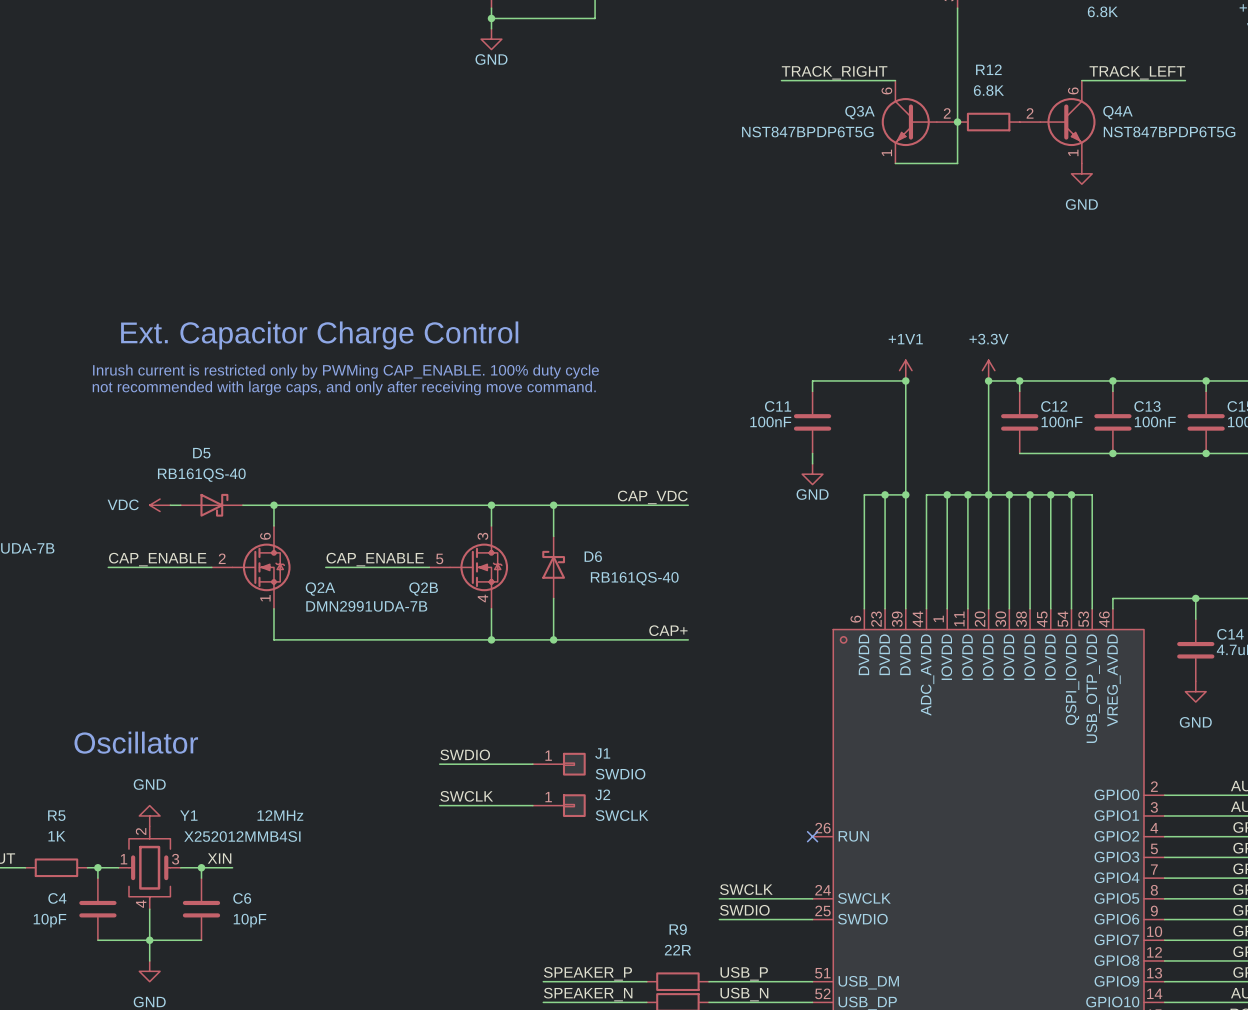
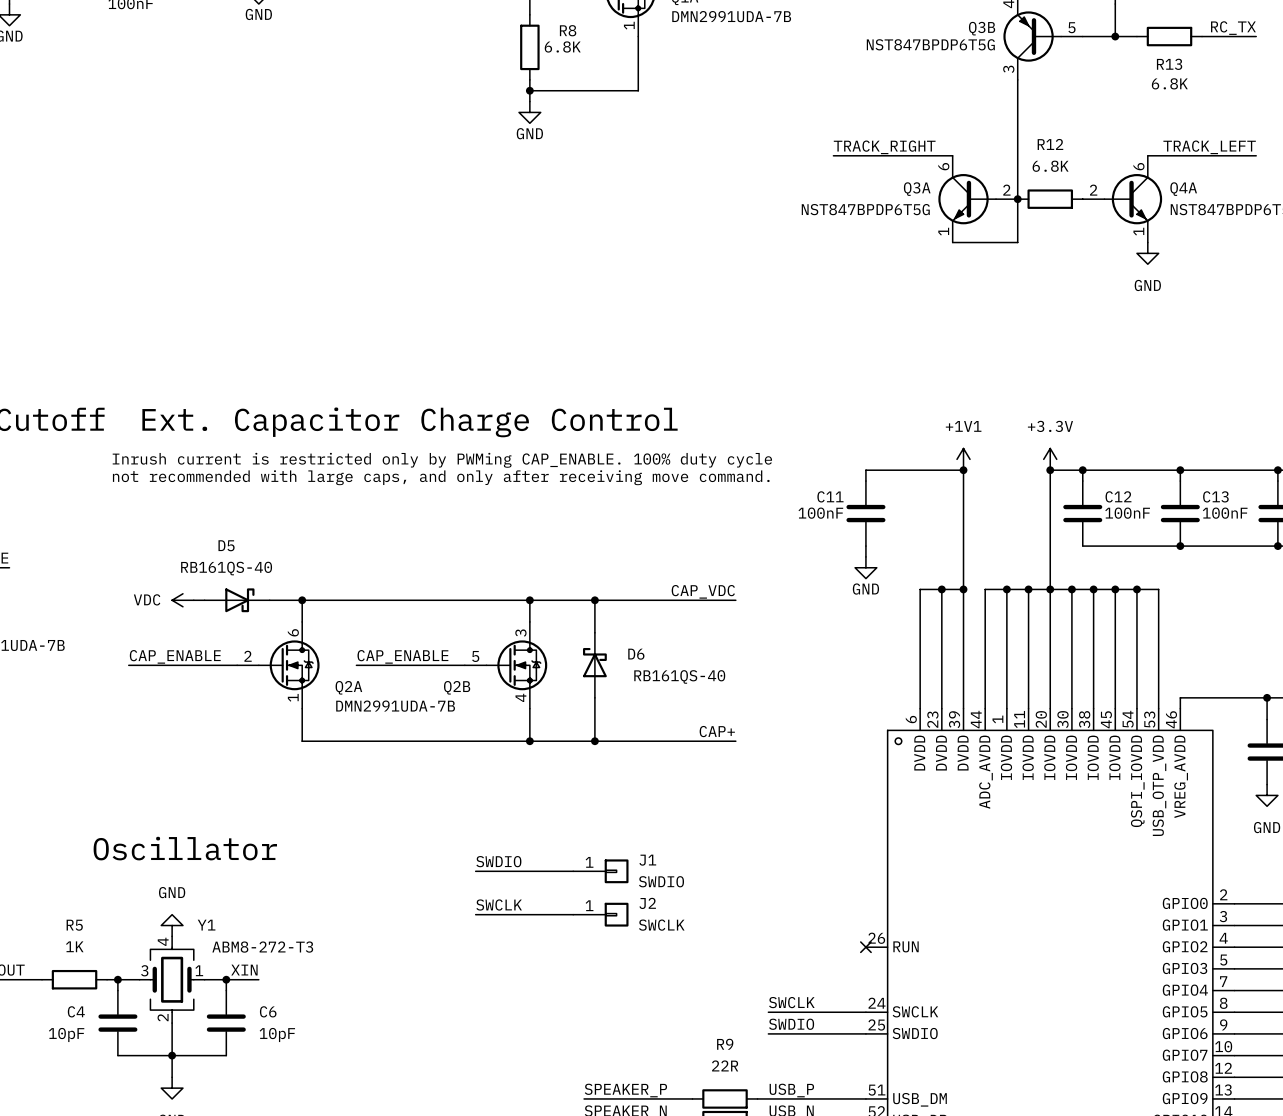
Y1 text: 12MHz (280, 815) -> none
Y1 value: X252012MMB4SI (242, 836) -> ABM8-272-T3 (262, 947)
Y1 rotation: 0° (149, 867) -> 180° (172, 979)

